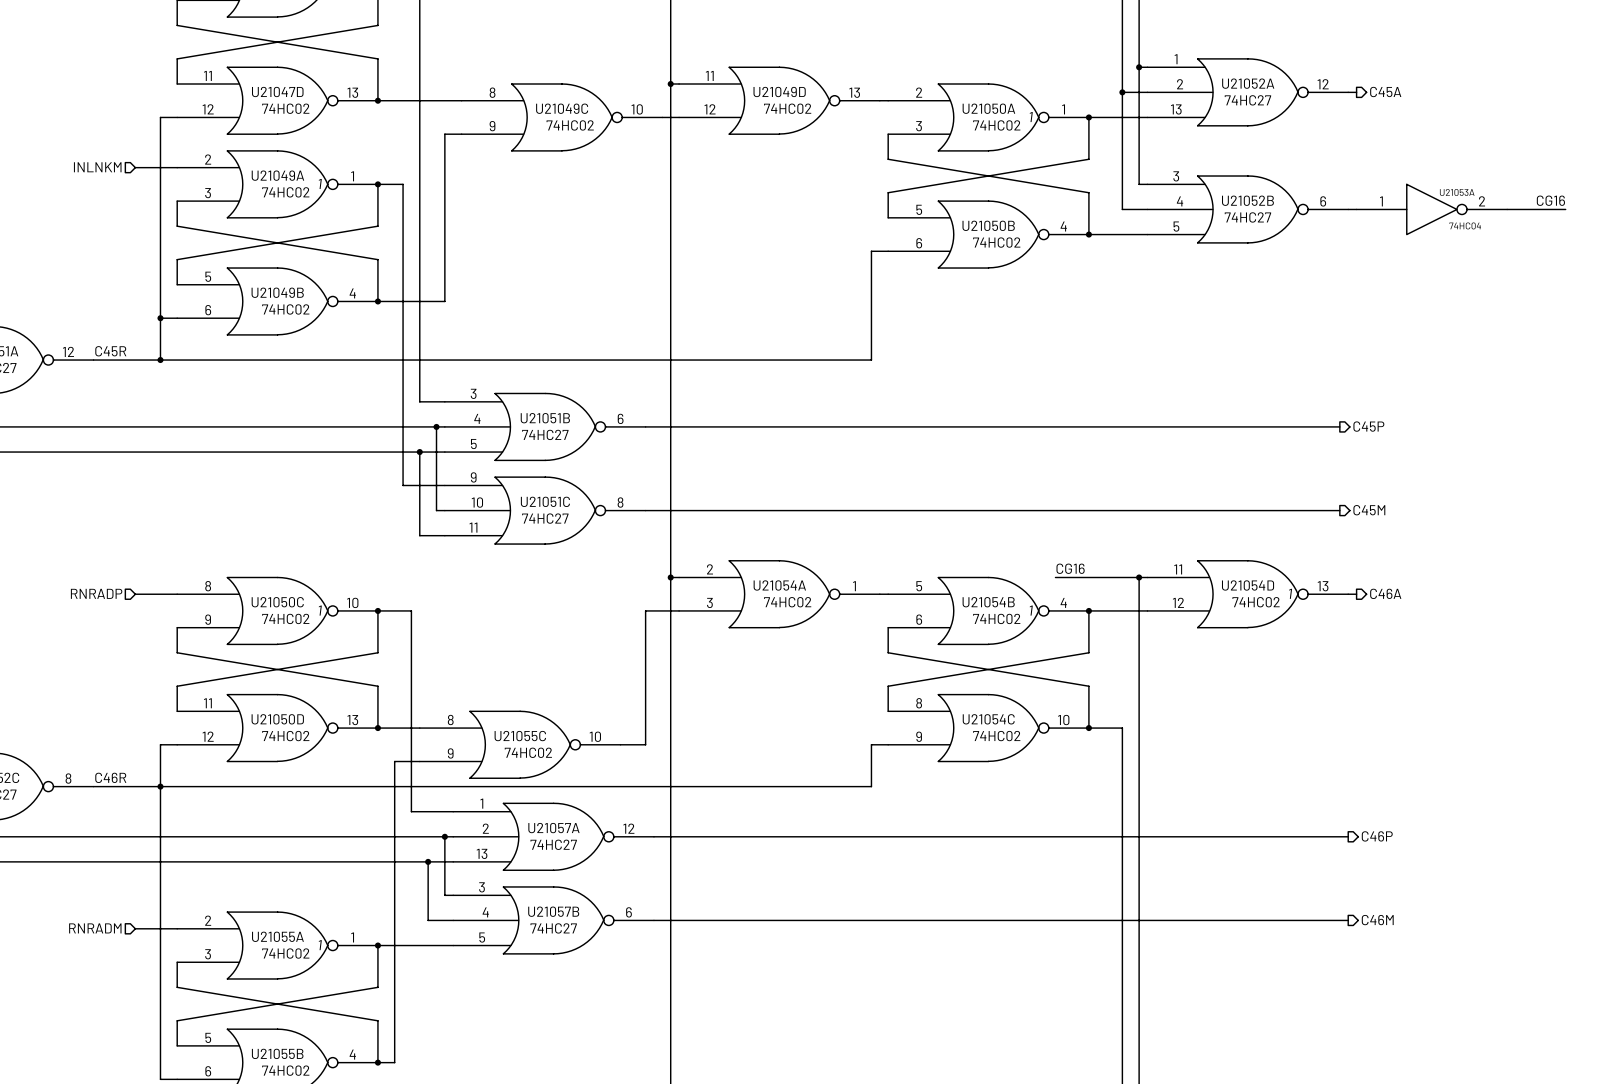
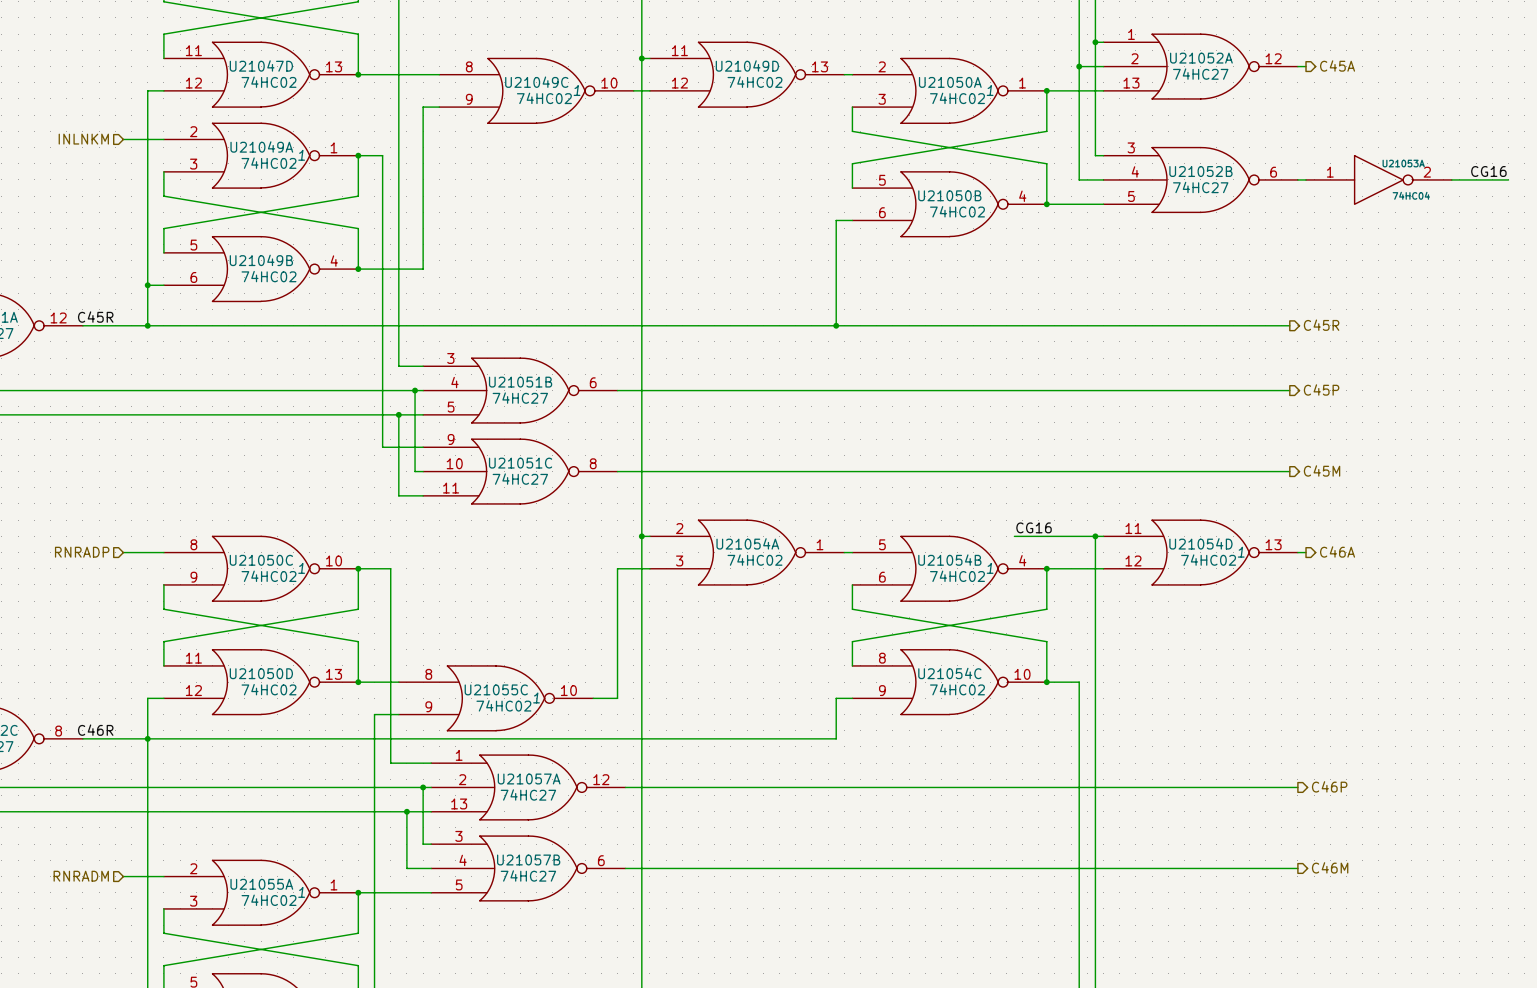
U21049C text: none -> 1 (577, 90)
hierarchical label: none -> C45R (1321, 325)
wire: none -> (836, 325) (1289, 325)
junction: none -> (836, 325)
U21055C text: none -> 1 (536, 698)

